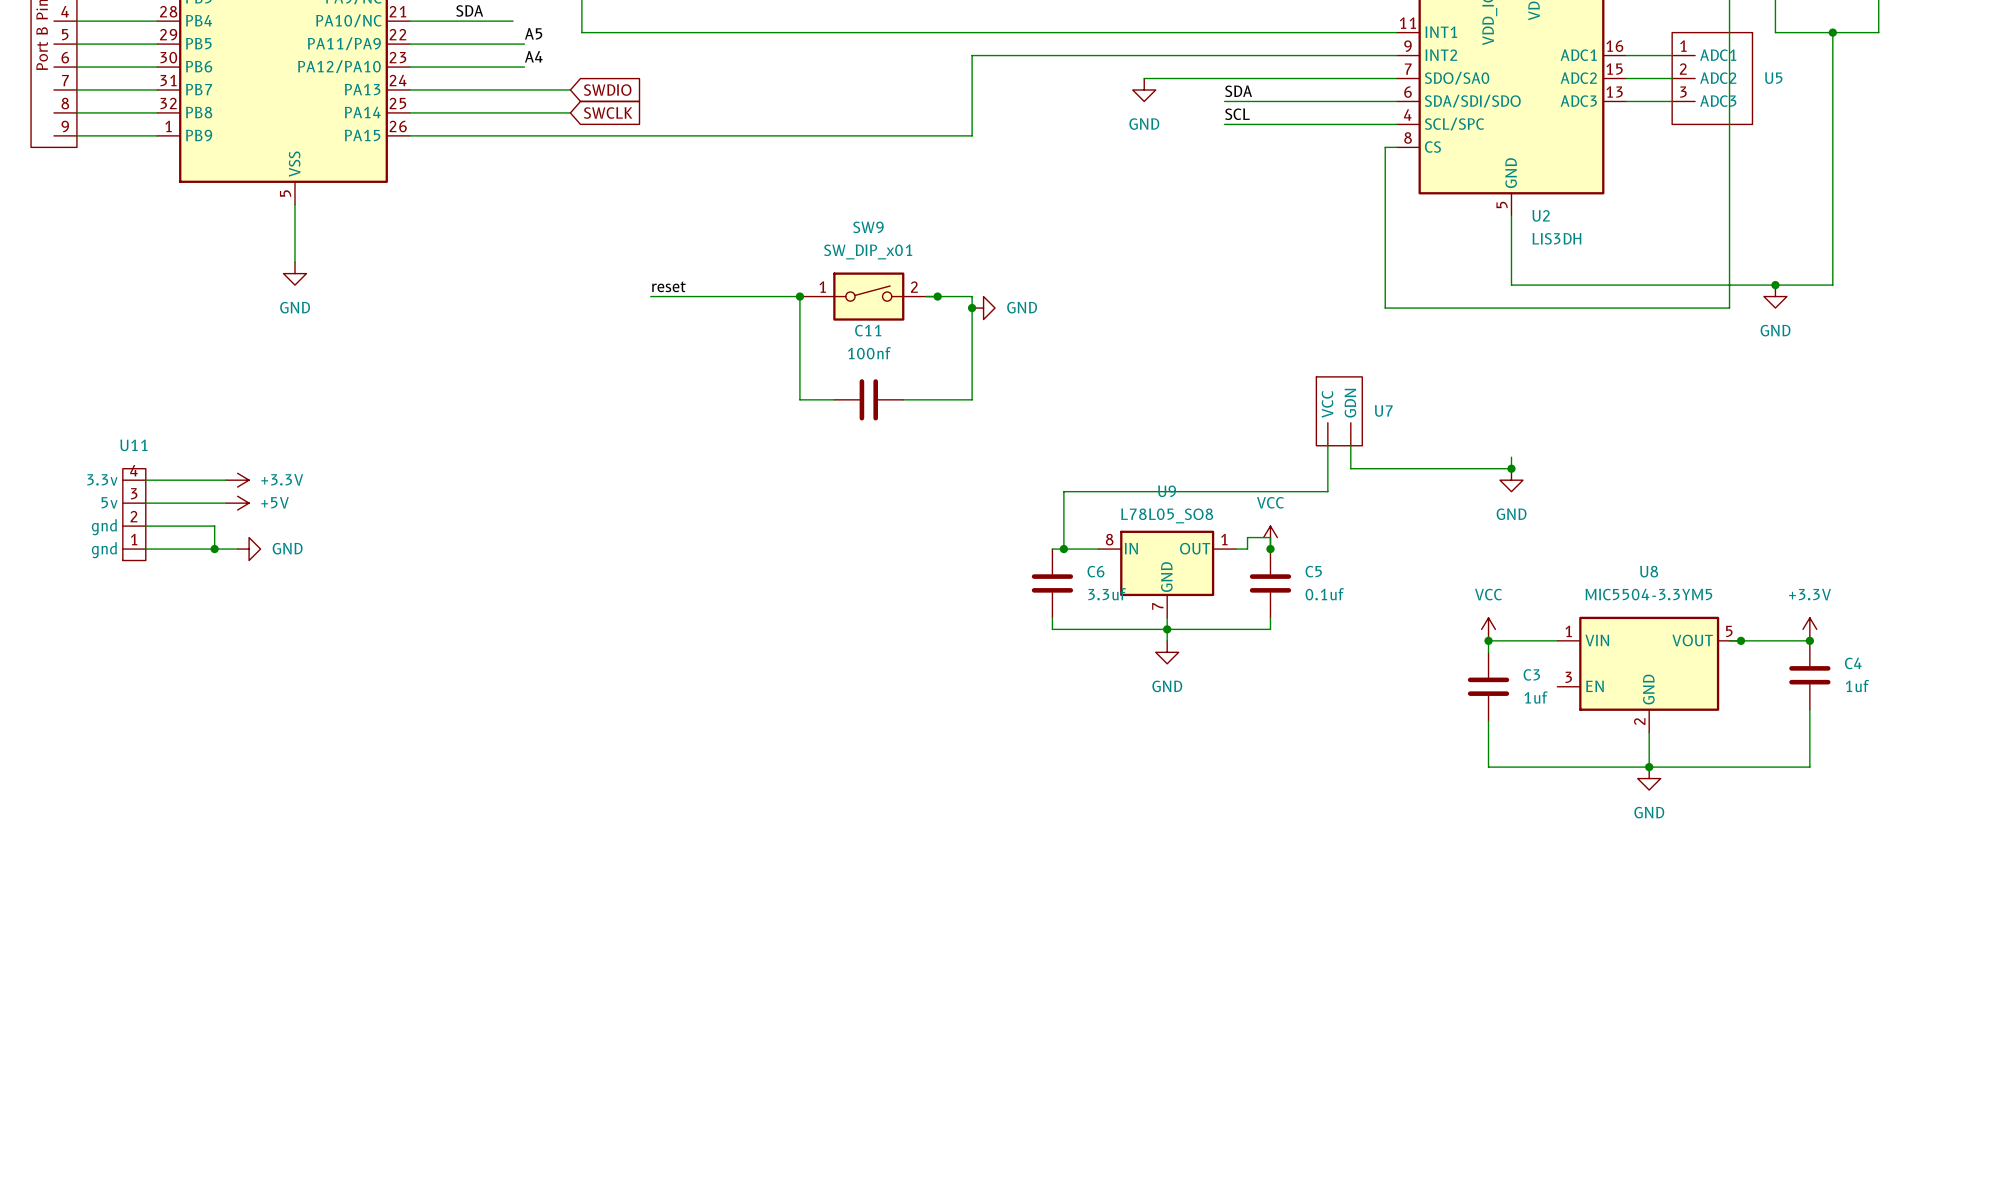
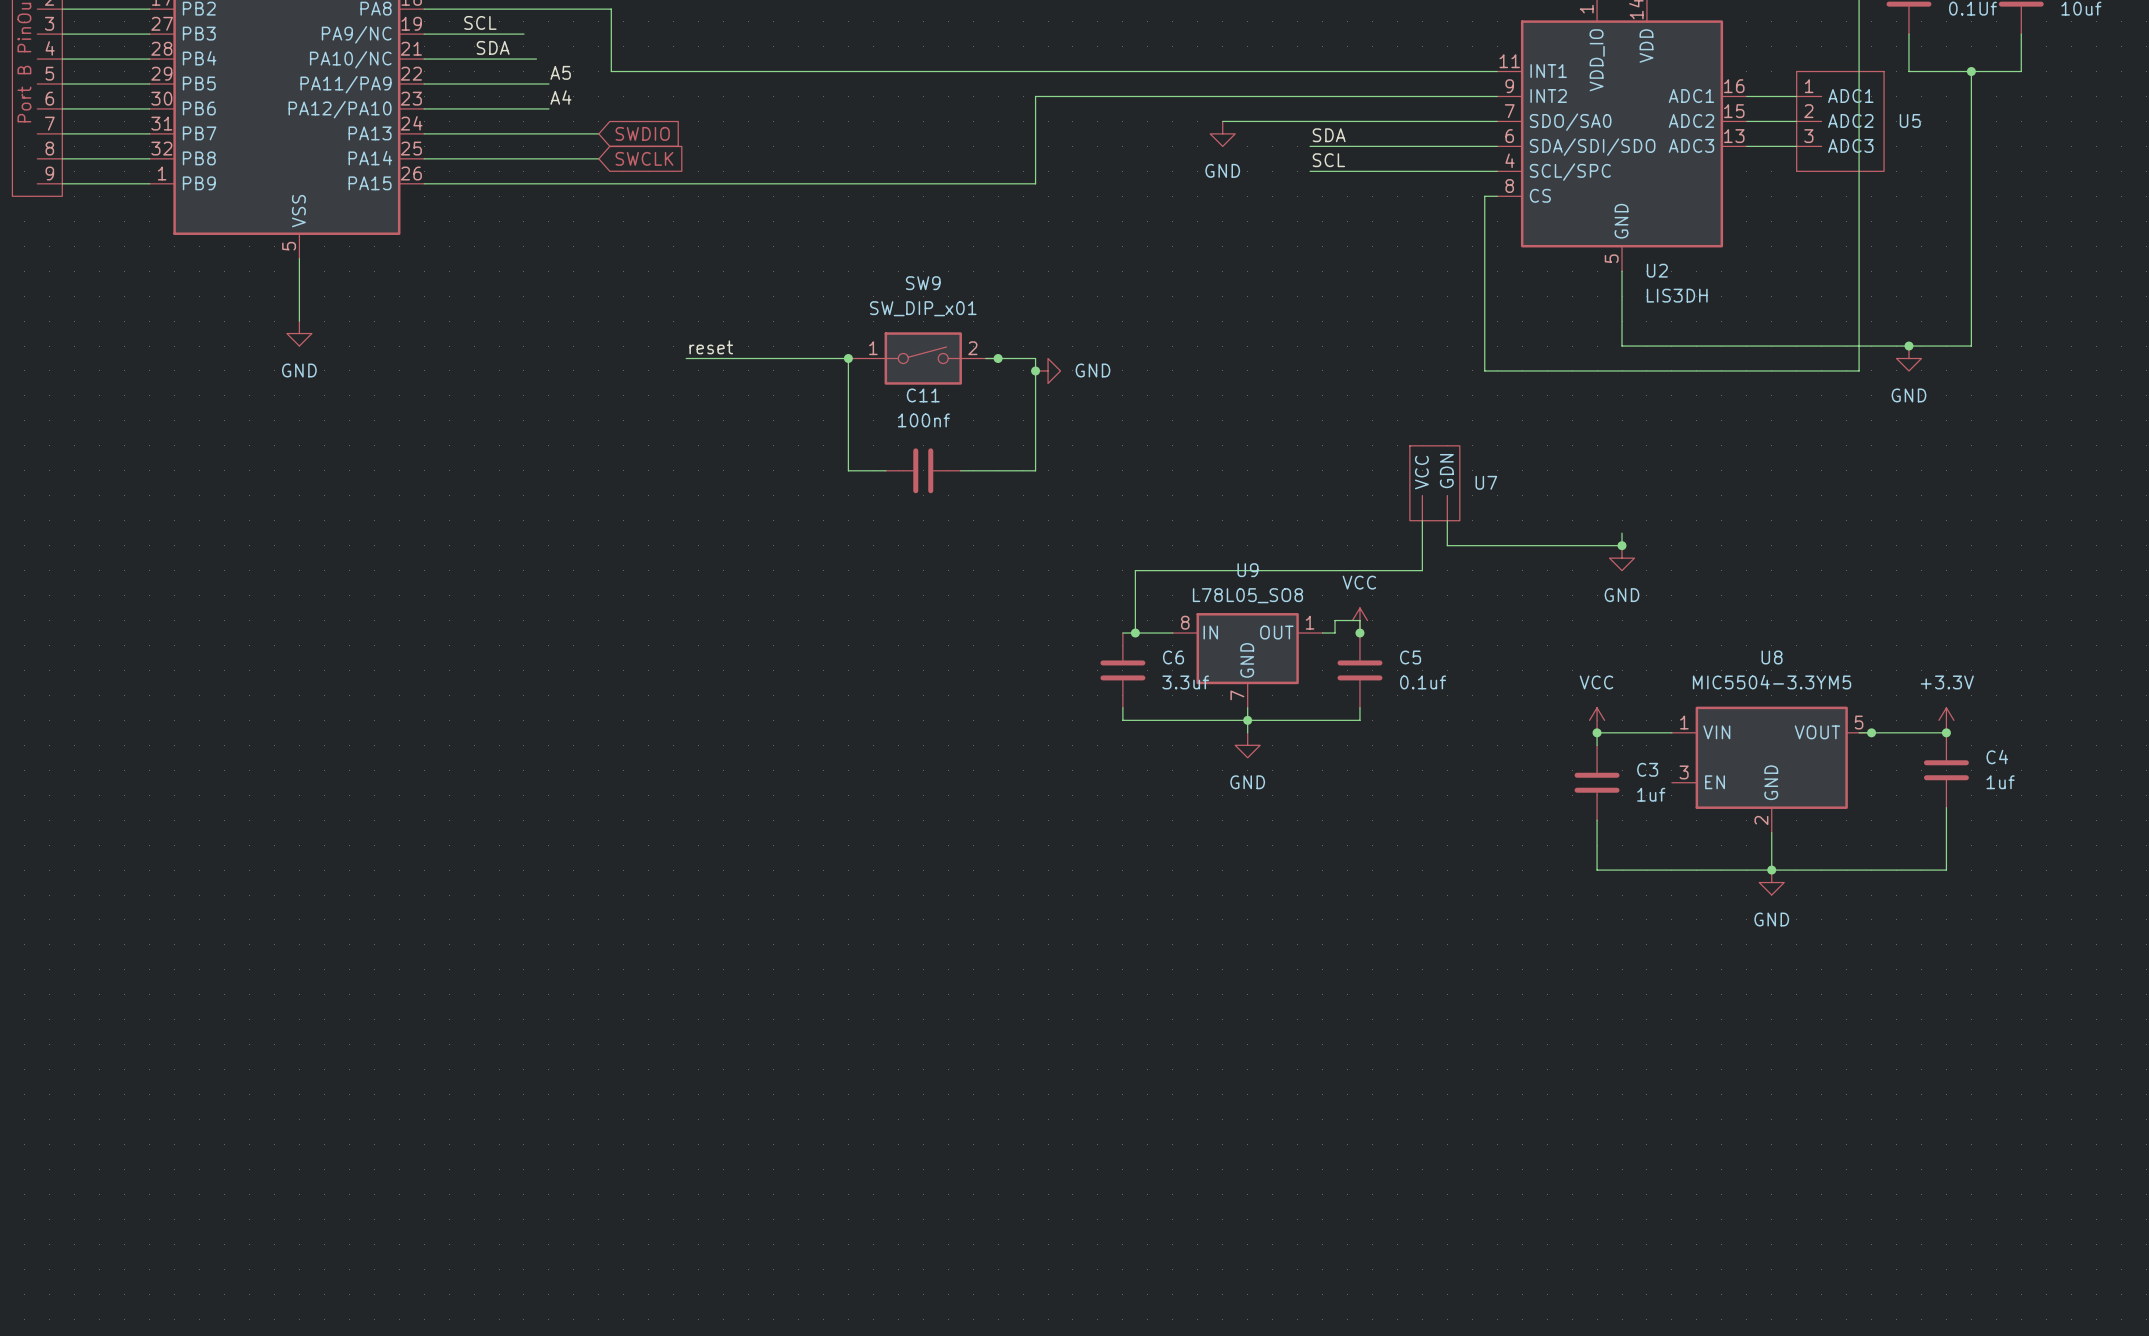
wire: (145, 480) (226, 480) -> none
power symbol: +3.3V (237, 480) -> none
wire: (145, 503) (226, 503) -> none
power symbol: +5V (237, 503) -> none
U11: (134, 514) -> none
wire: (145, 526) (214, 526) (214, 549) -> none
wire: (145, 549) (237, 549) -> none
junction: (214, 549) -> none
power symbol: GND (249, 549) -> none

